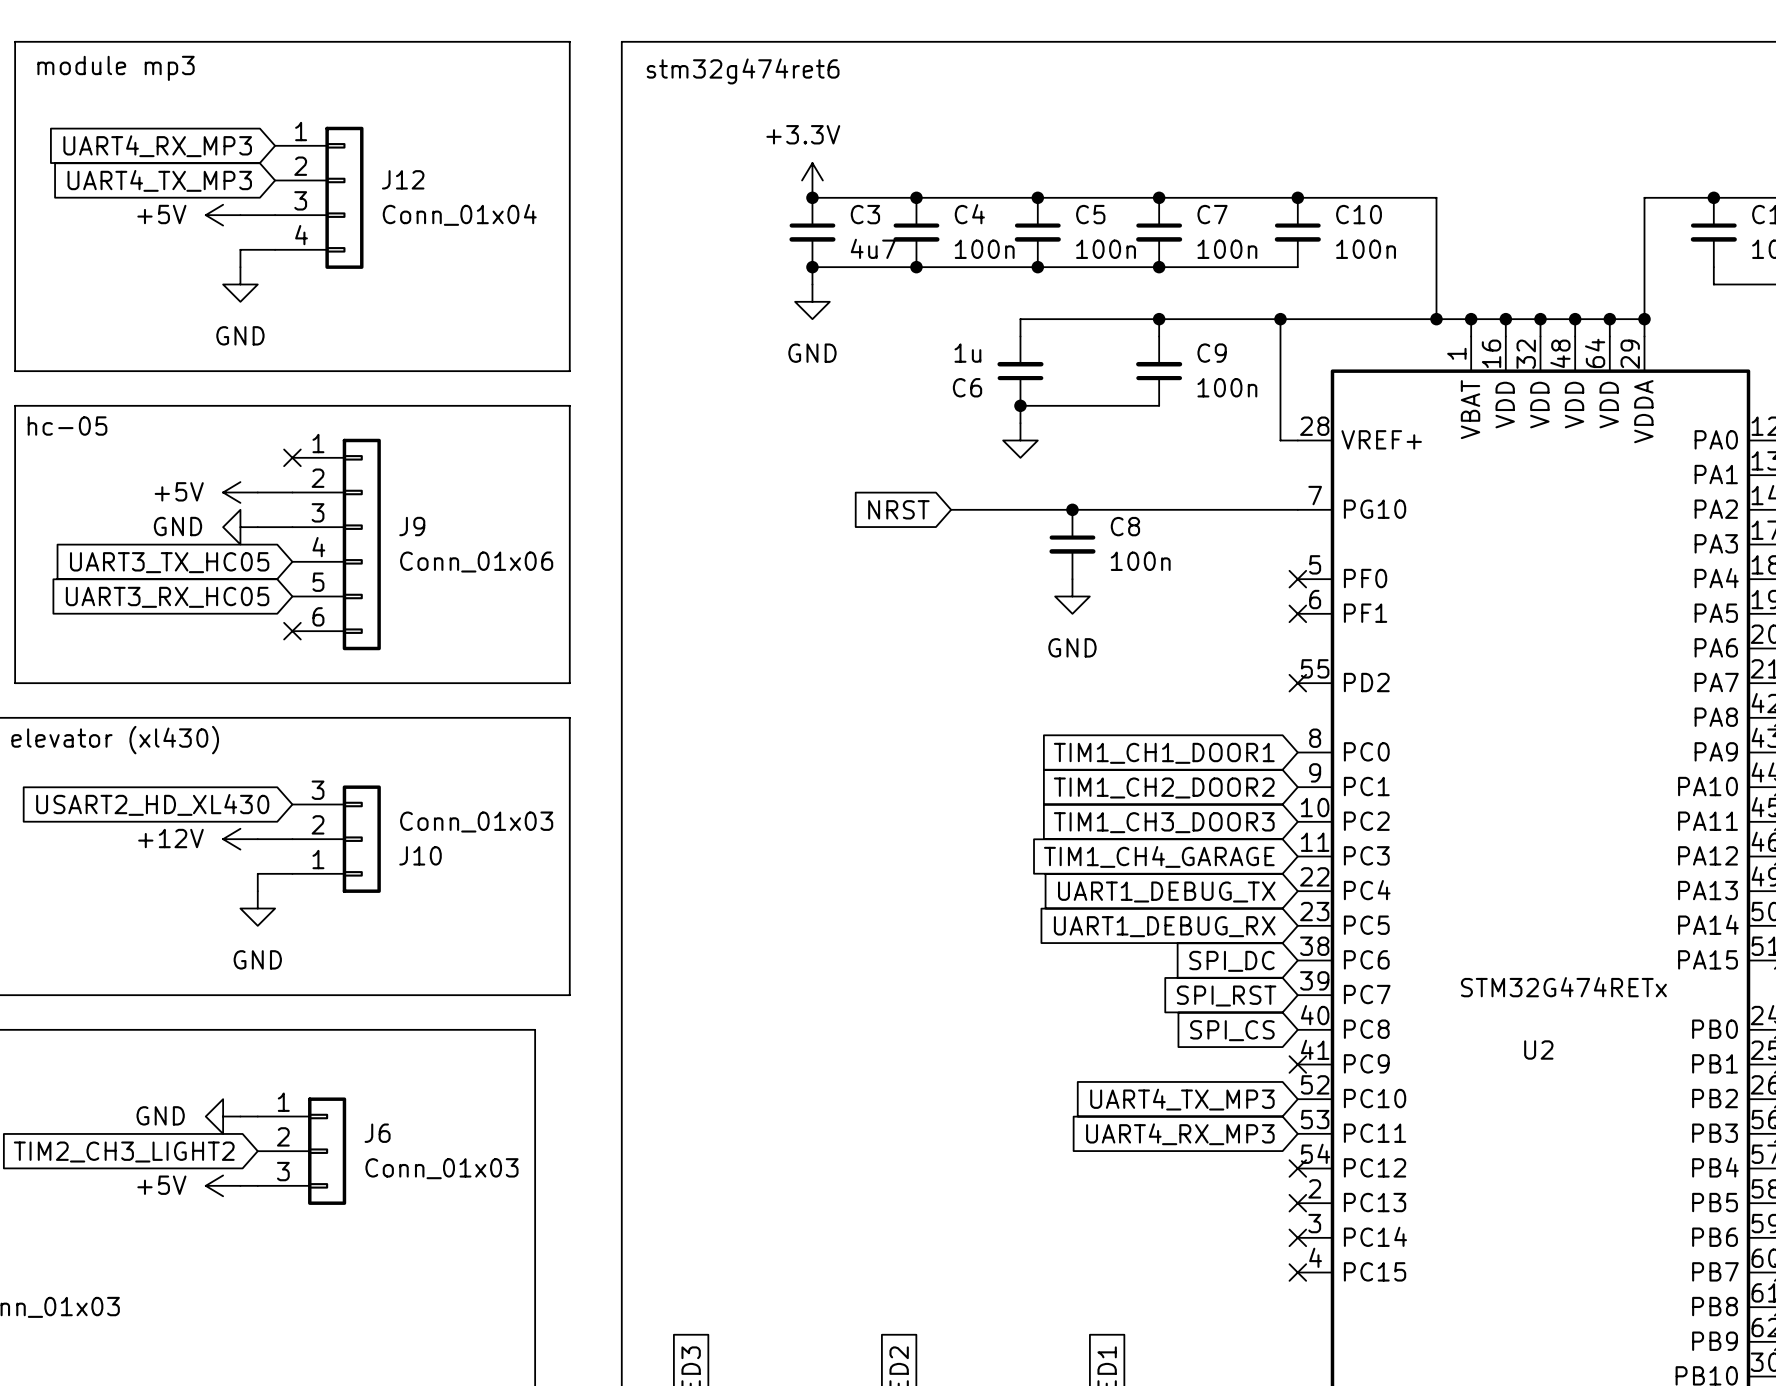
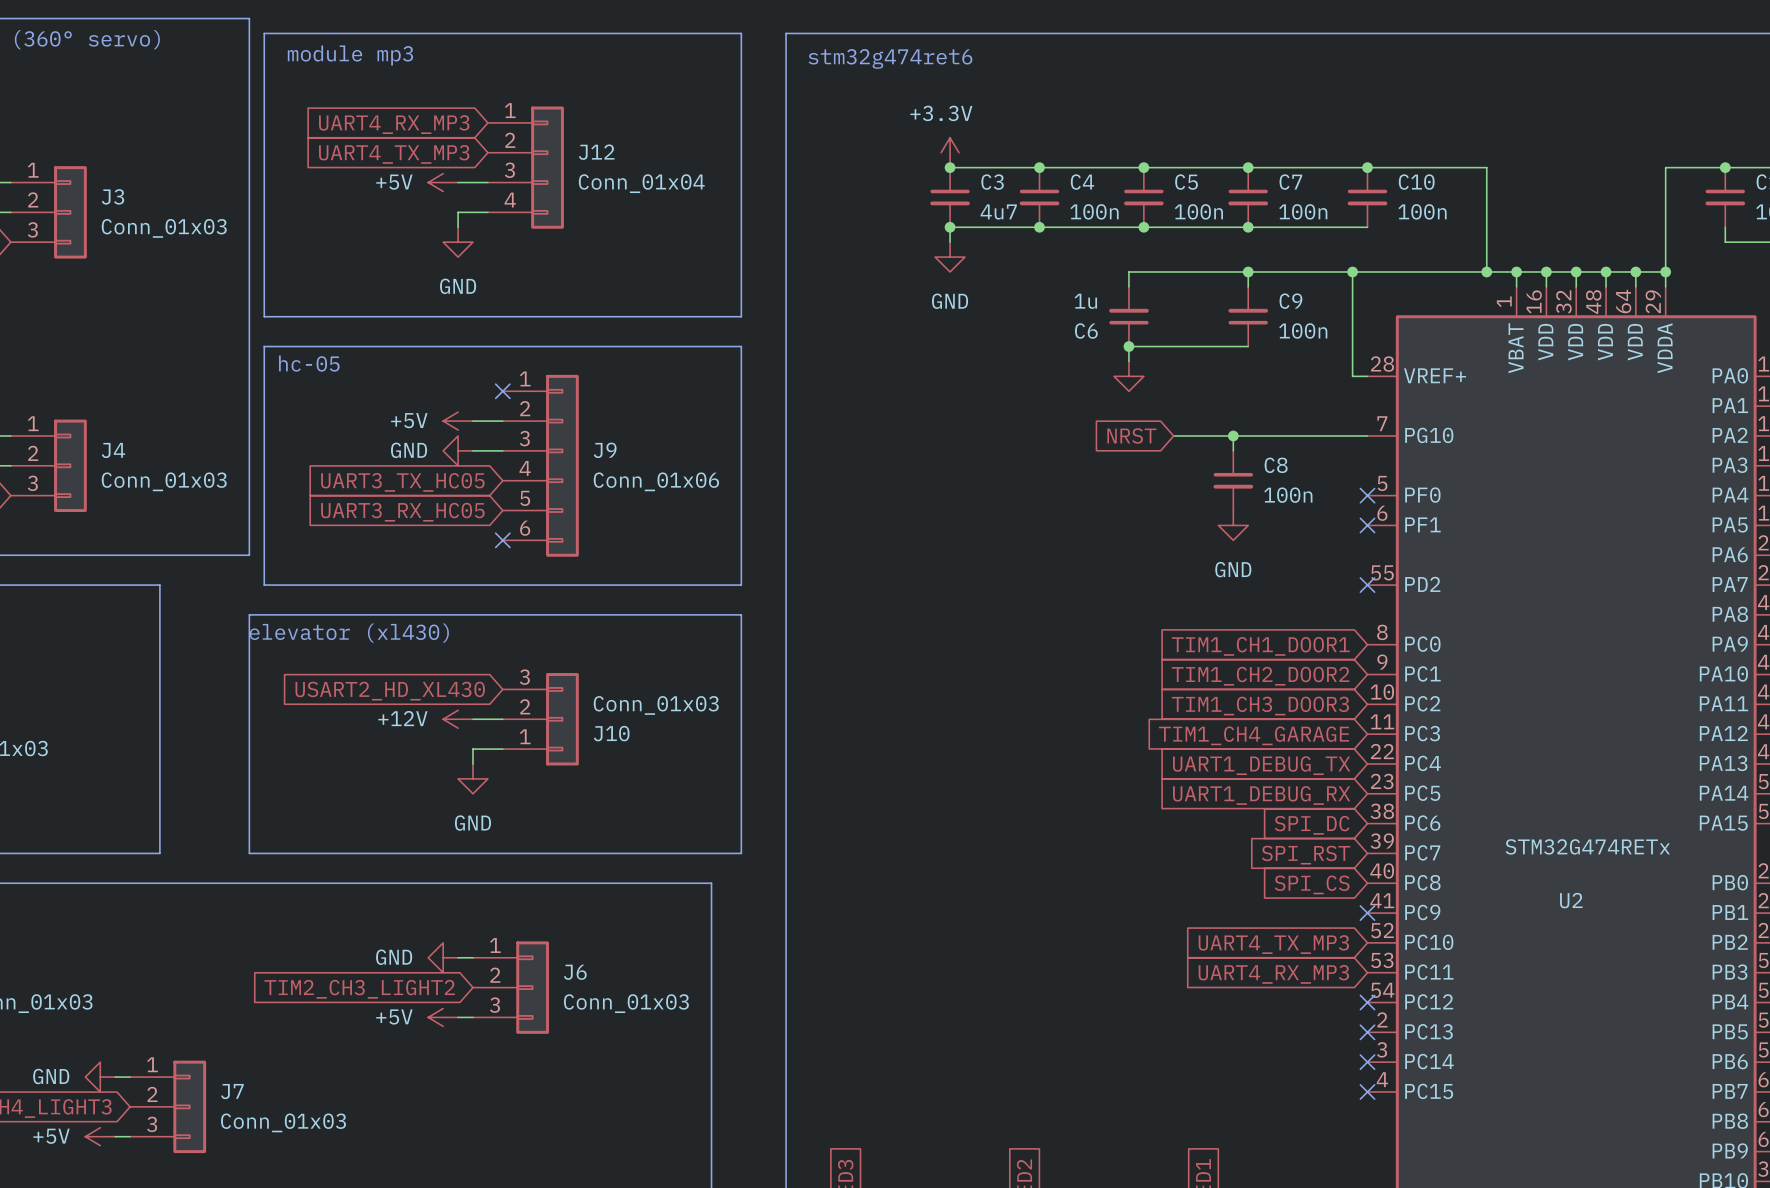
global label position: NRST (898, 509) -> NRST (1131, 435)
wire: (951, 509) (1072, 509) -> none
junction position: (1072, 509) -> (1233, 435)
wire: none -> (1233, 435) (1233, 450)
C8 position: (1072, 544) -> (1233, 480)
power symbol position: GND (1072, 596) -> GND (1233, 525)

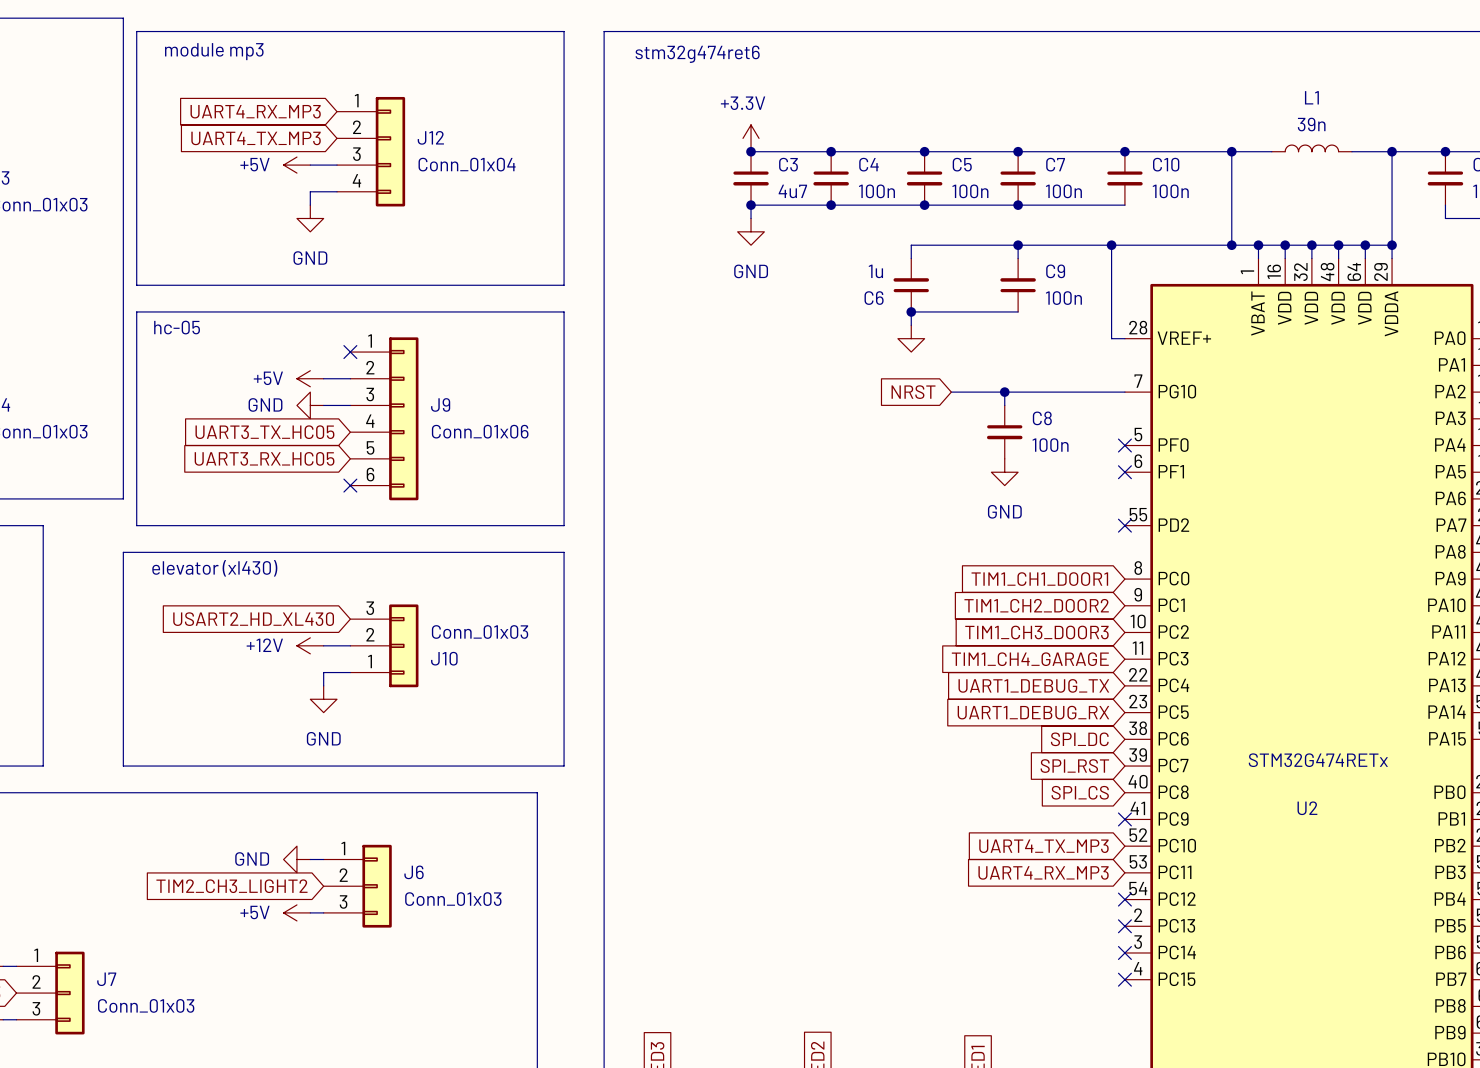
L1: none -> 39n (1311, 148)
wire: none -> (1231, 151) (1271, 151)
junction: none -> (1231, 151)
wire: none -> (1351, 151) (1392, 151)
junction: none -> (1392, 151)

